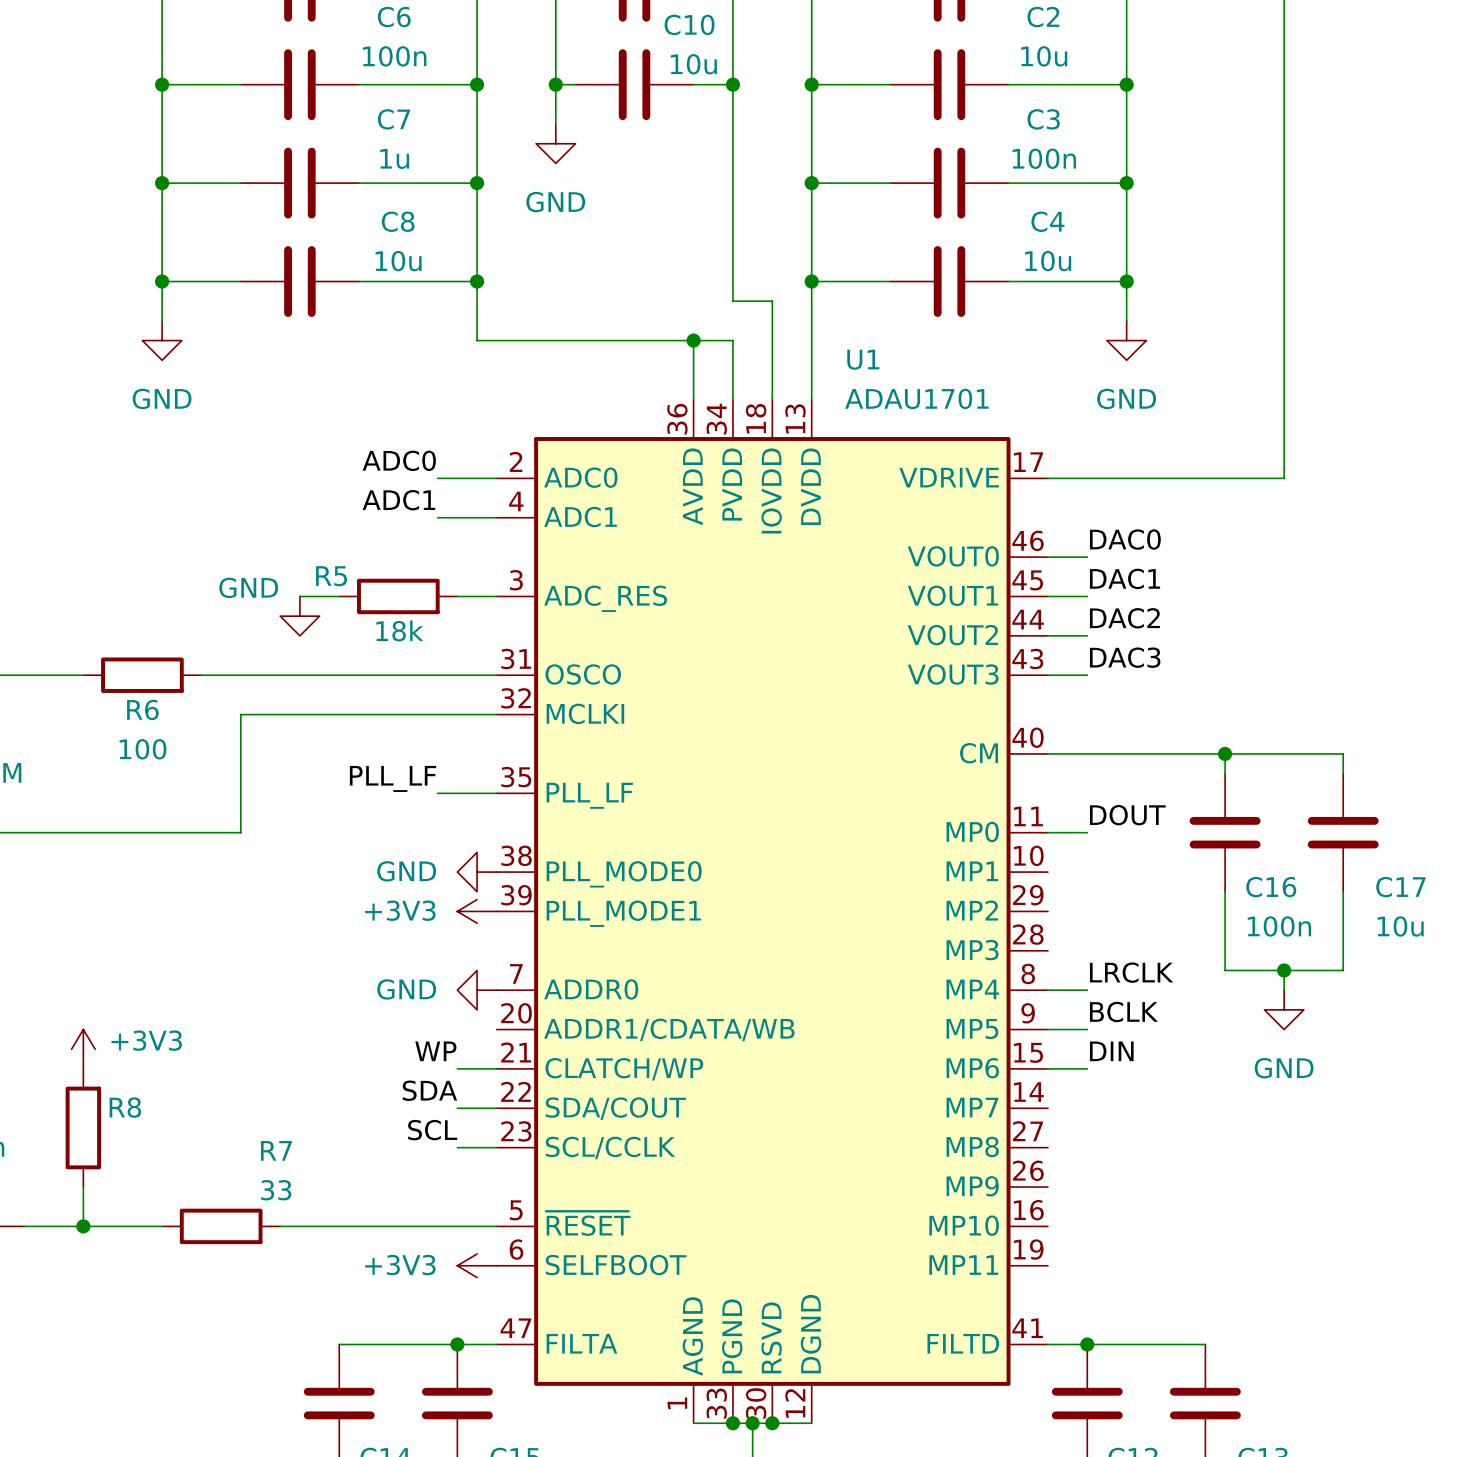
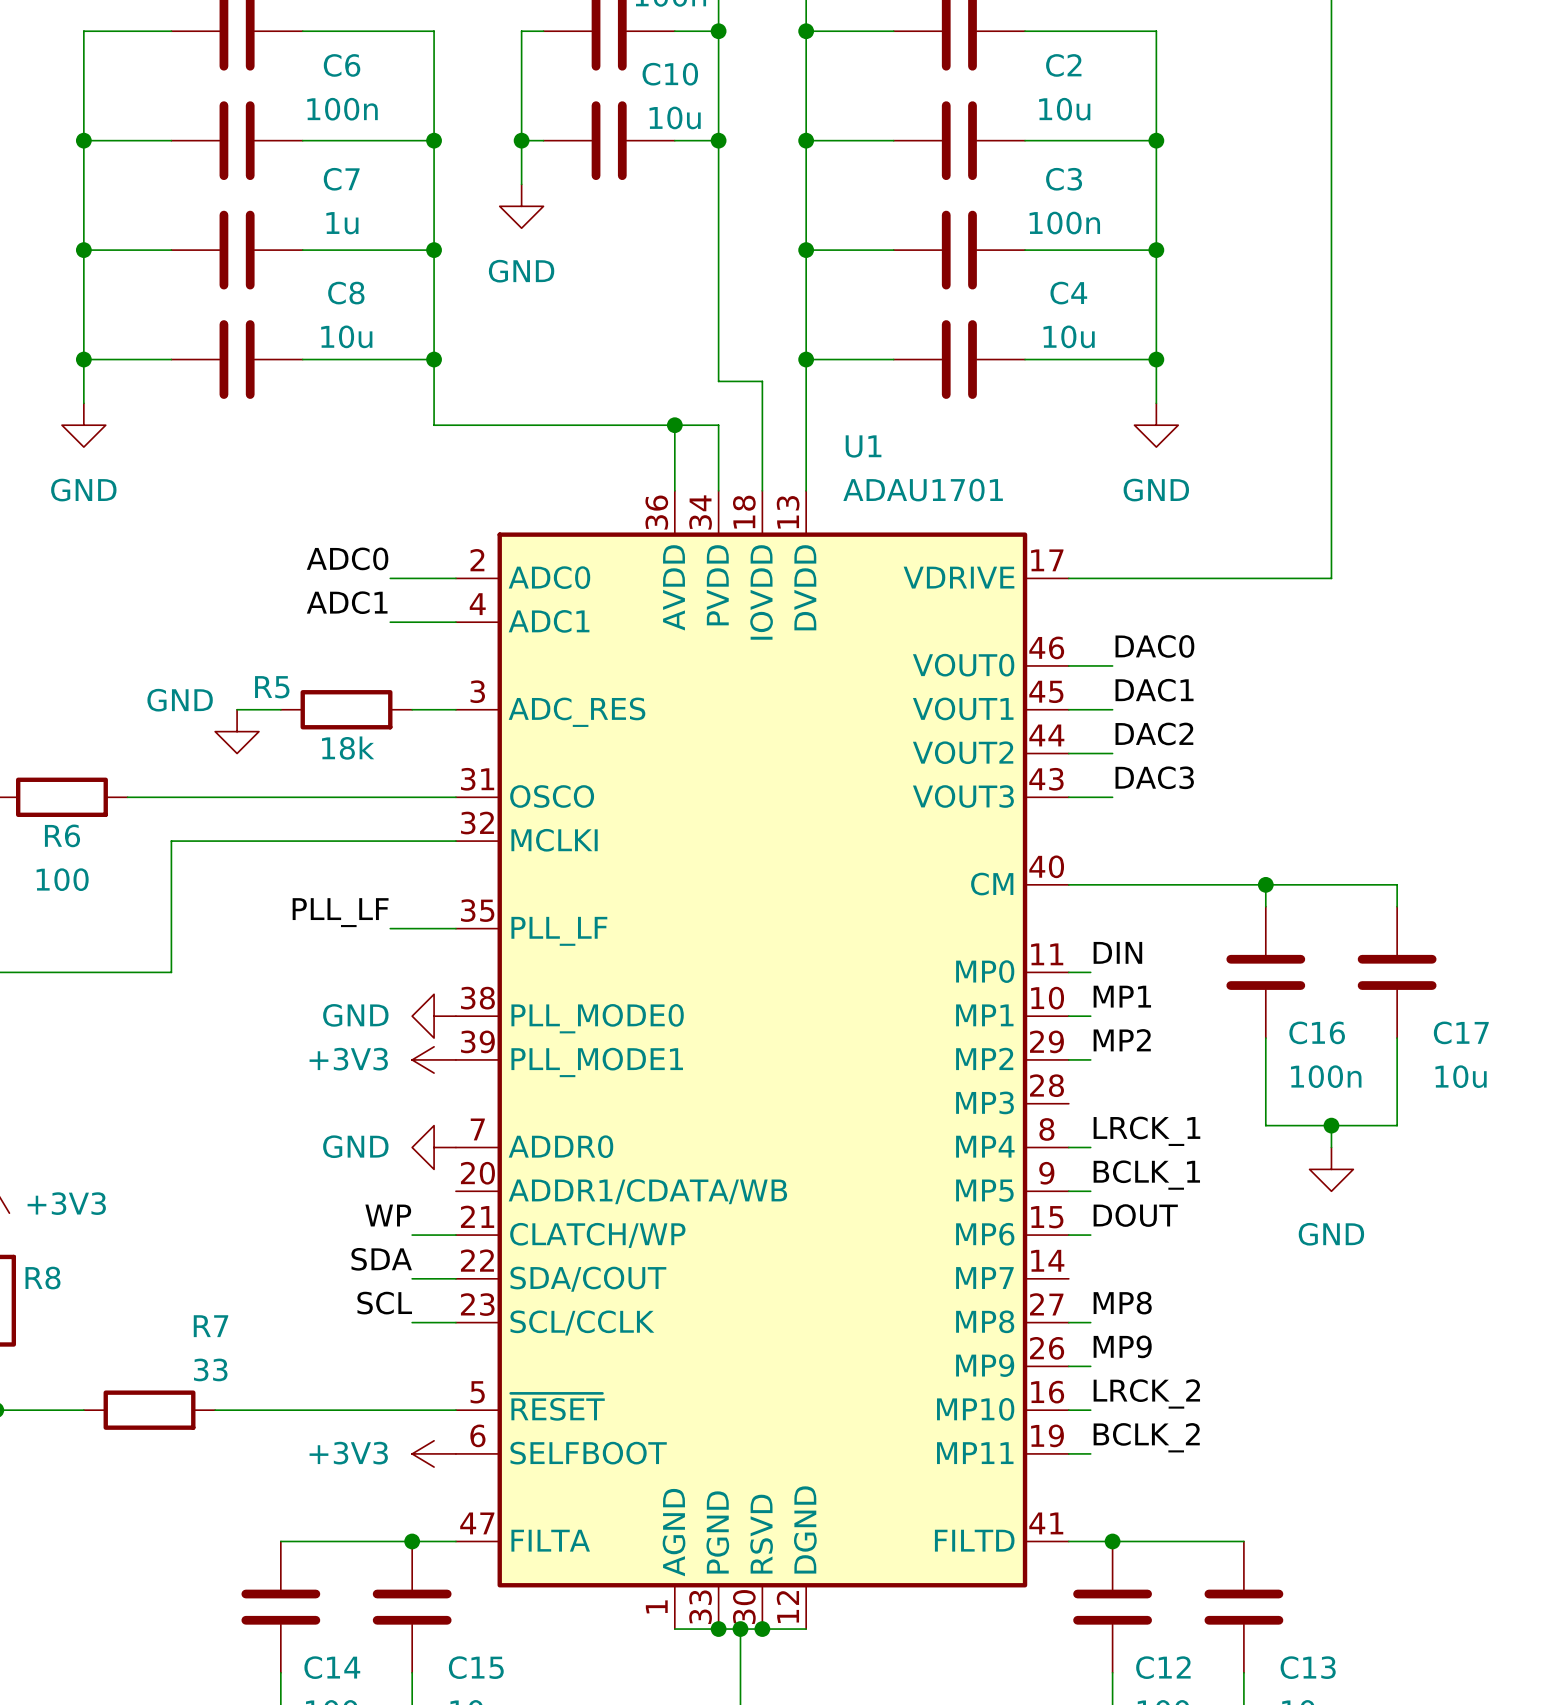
label position: DOUT (1127, 815) -> DOUT (1135, 1215)
wire: (1067, 832) (1087, 832) -> (1068, 1059) (1090, 1059)
label: none -> MP1 (1122, 996)
wire: none -> (1068, 1016) (1090, 1016)
label: none -> MP2 (1122, 1040)
label: LRCLK (1131, 972) -> LRCK_1 (1146, 1131)
wire: (1067, 990) (1087, 990) -> (1068, 1322) (1090, 1322)
label: BCLK (1123, 1011) -> BCLK_1 (1146, 1175)
wire: (1067, 1029) (1087, 1029) -> (1068, 1366) (1090, 1366)
label position: DIN (1111, 1051) -> DIN (1117, 952)
wire: (1067, 1068) (1087, 1068) -> (1068, 1410) (1090, 1410)
label: none -> MP8 (1122, 1303)
label: none -> MP9 (1122, 1346)
label: none -> LRCK_2 (1146, 1393)
label: none -> BCLK_2 (1146, 1437)
wire: none -> (1068, 1453) (1090, 1453)

